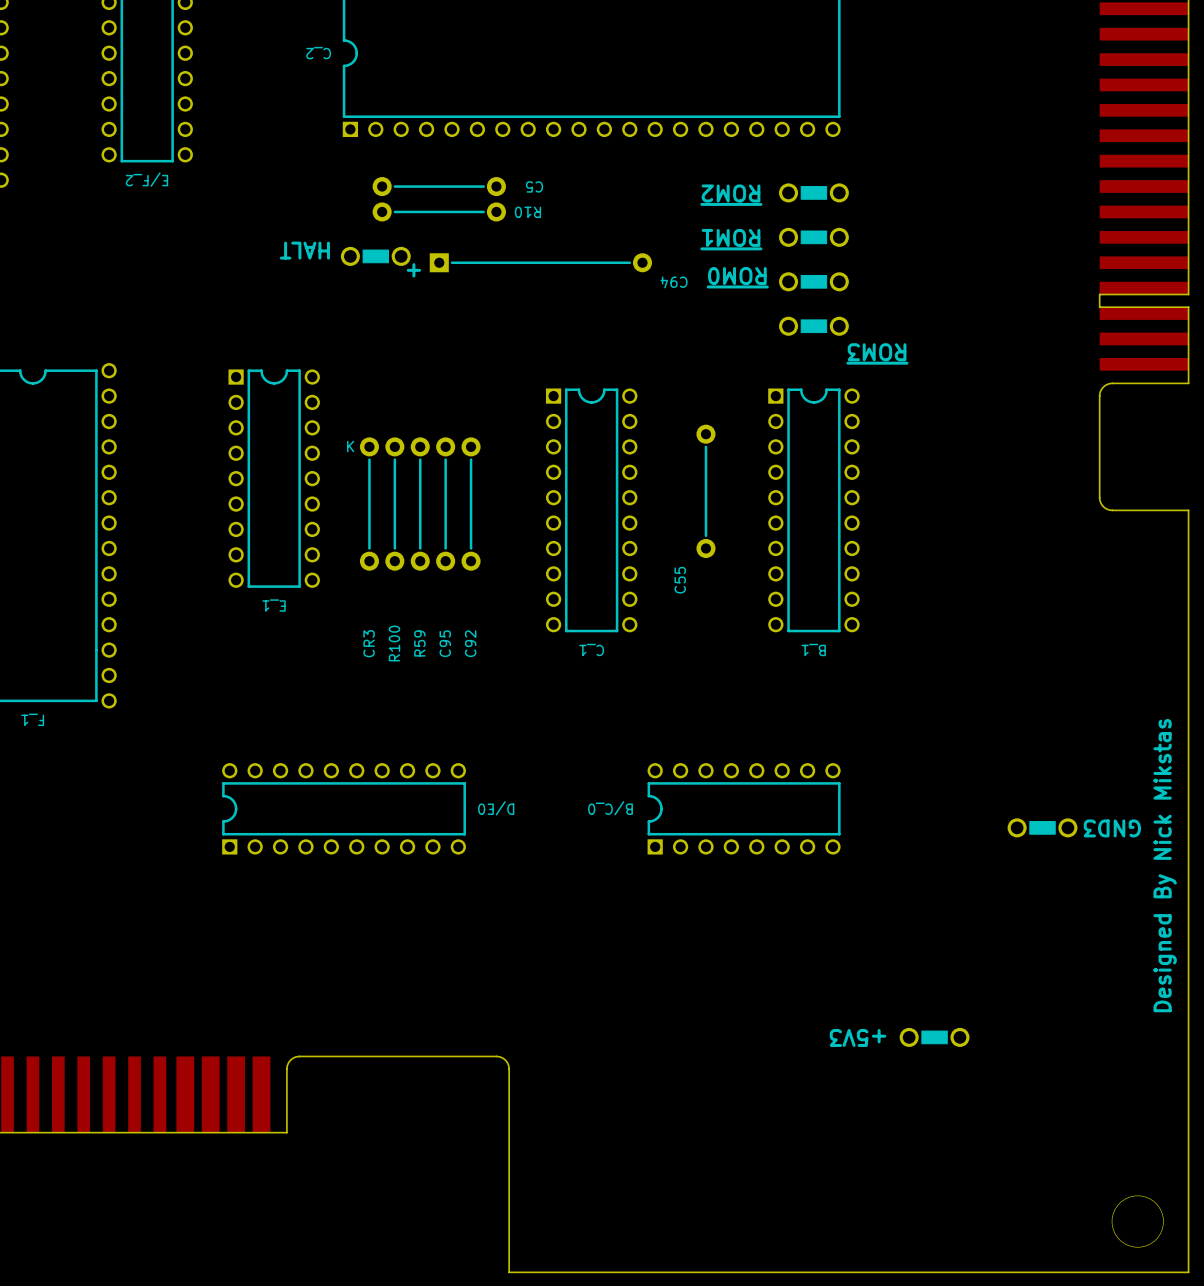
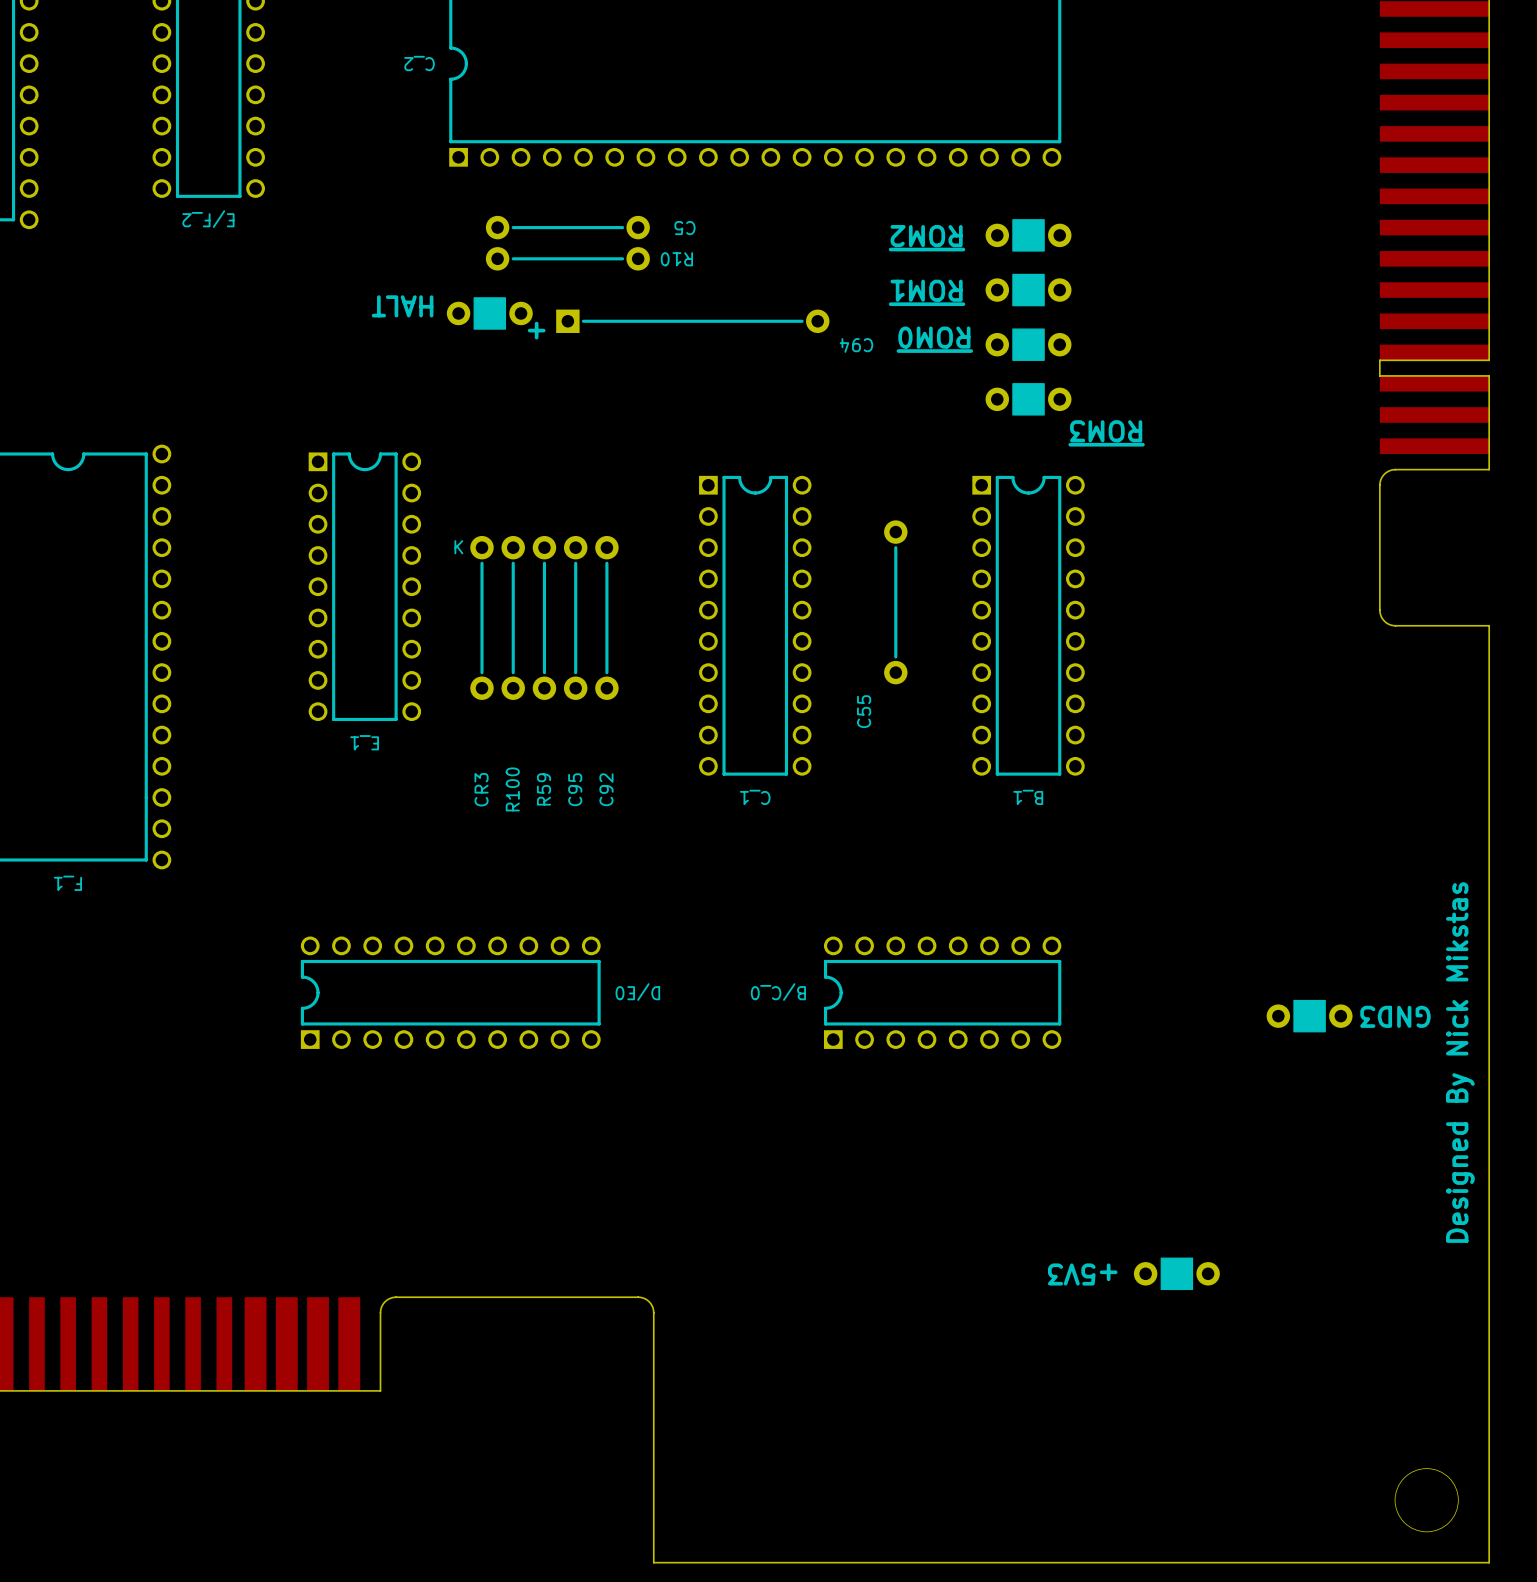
part footprint: [779, 183, 849, 203] -> [985, 219, 1072, 252]
part footprint: [779, 227, 849, 247] -> [985, 273, 1072, 307]
part footprint: [340, 246, 411, 266] -> [446, 297, 533, 330]
part footprint: [779, 272, 849, 292] -> [985, 328, 1072, 361]
part footprint: [779, 316, 849, 336] -> [985, 383, 1072, 416]
part footprint: [1007, 818, 1078, 838] -> [1266, 999, 1353, 1033]
part footprint: [899, 1027, 970, 1047] -> [1133, 1257, 1220, 1291]

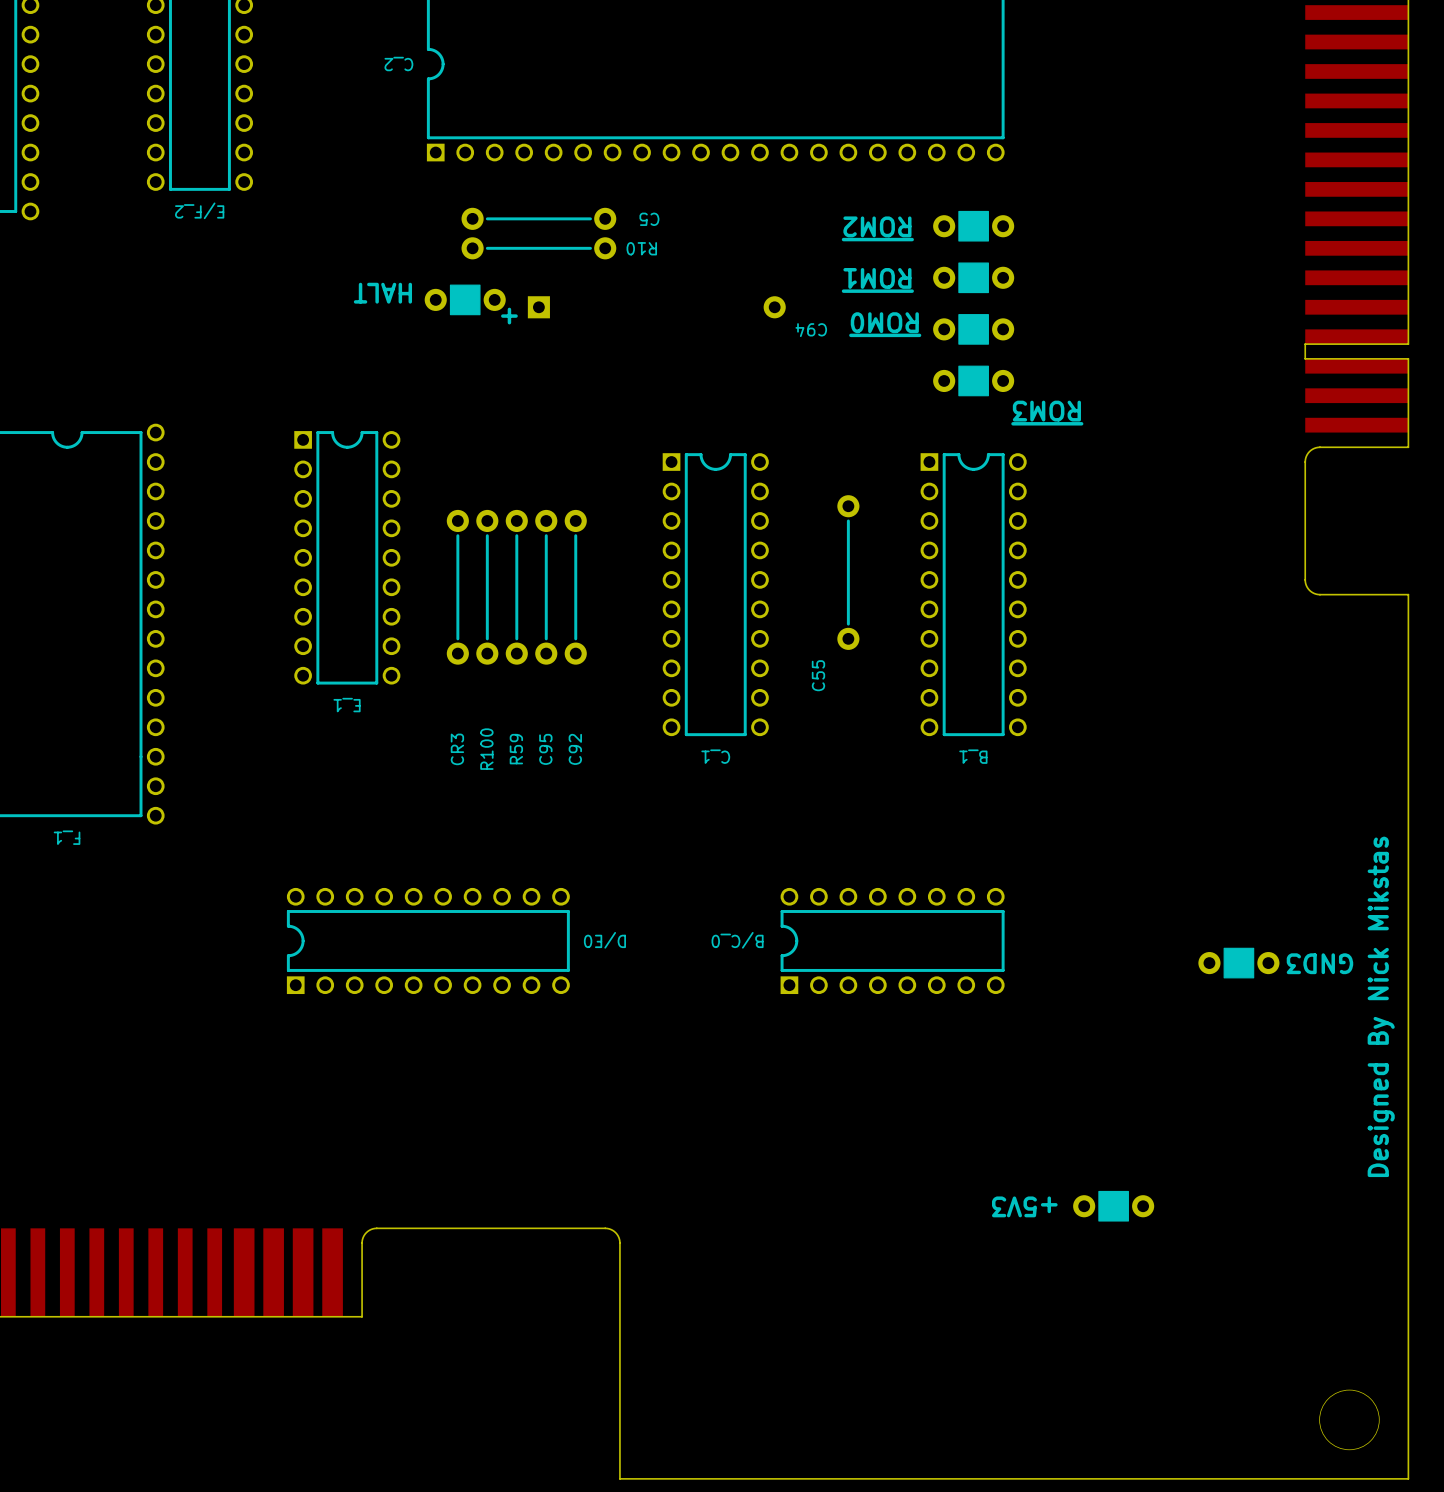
line: (583, 321) (802, 321) -> none
text: K (458, 547) -> none

